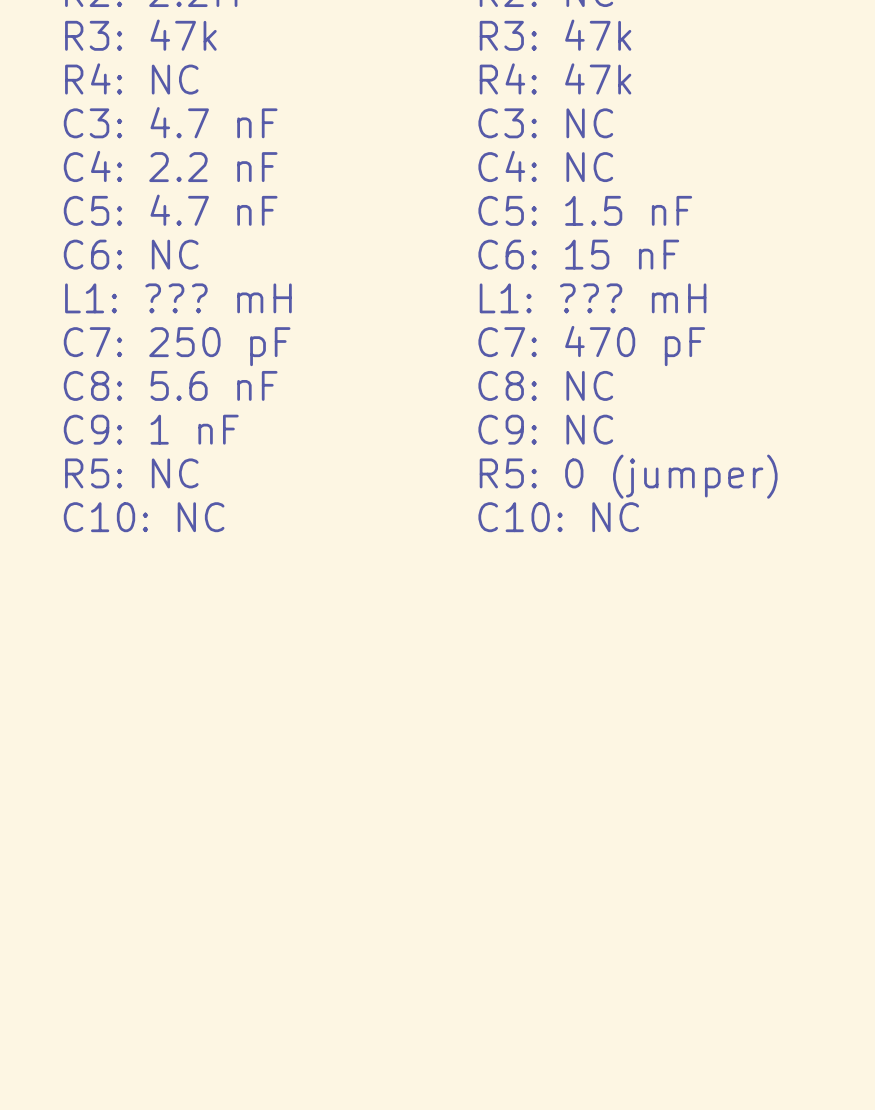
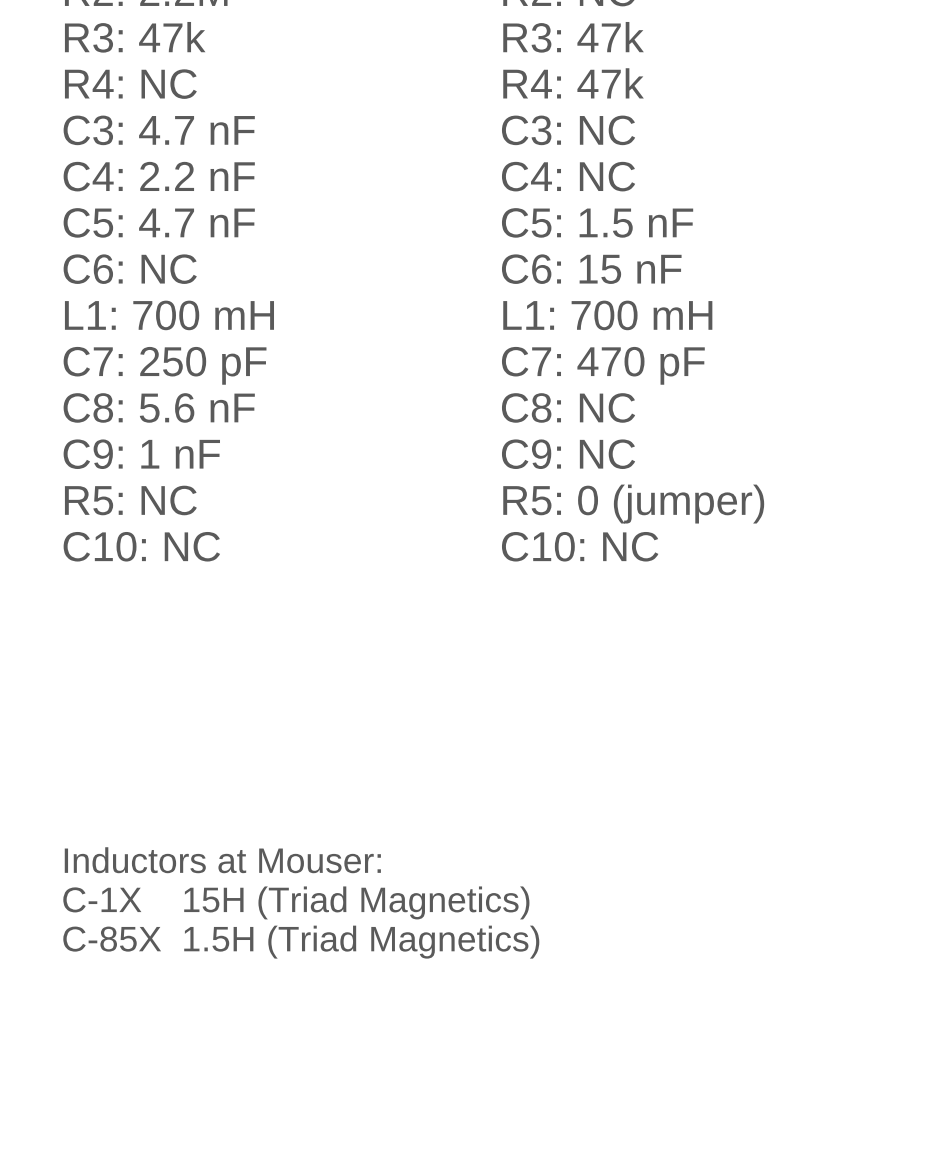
text: L1: ??? mH (178, 298) -> L1: 700 mH (169, 315)
text: L1: ??? mH (593, 298) -> L1: 700 mH (607, 315)
text: none -> Inductors at Mouser: (222, 860)
text: none -> C-1X 15H (Triad Magnetics) (296, 902)
text: none -> C-85X 1.5H (Triad Magnetics) (301, 942)

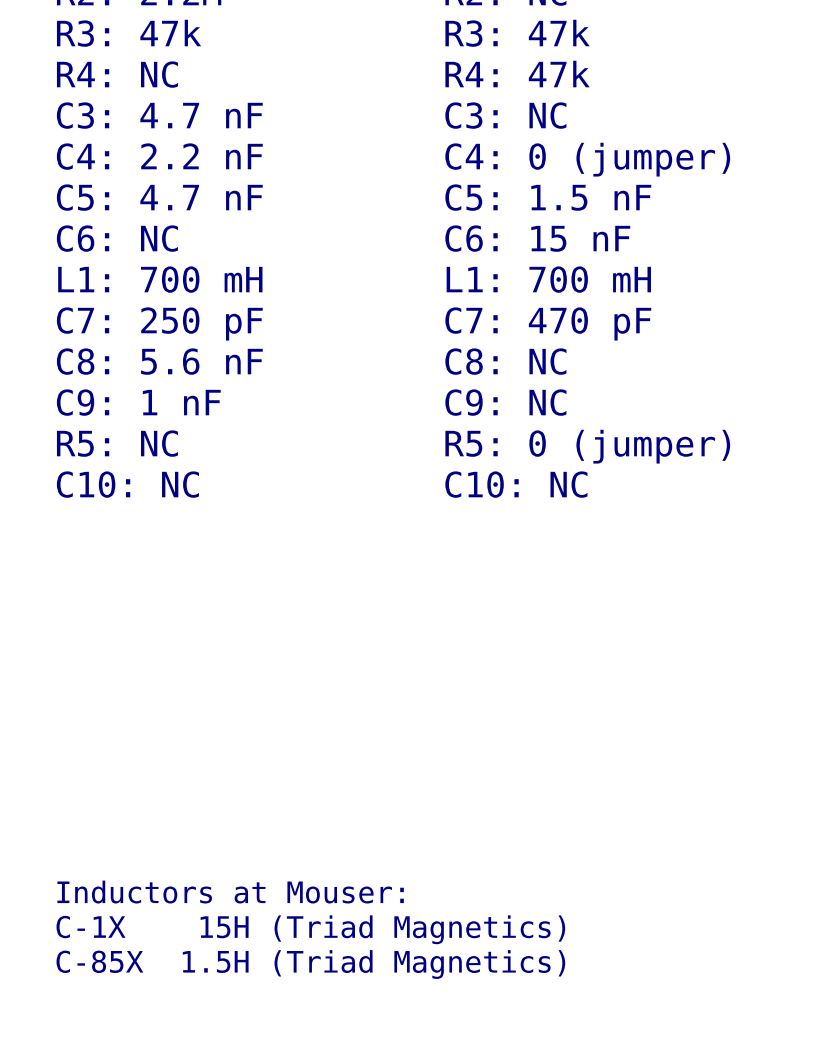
text: C4: NC (568, 176) -> C4: 0 (jumper) (587, 159)
text position: Inductors at Mouser: (222, 860) -> Inductors at Mouser: (230, 892)
text position: C-1X 15H (Triad Magnetics) (296, 902) -> C-1X 15H (Triad Magnetics) (310, 929)
text position: C-85X 1.5H (Triad Magnetics) (301, 942) -> C-85X 1.5H (Triad Magnetics) (310, 964)

